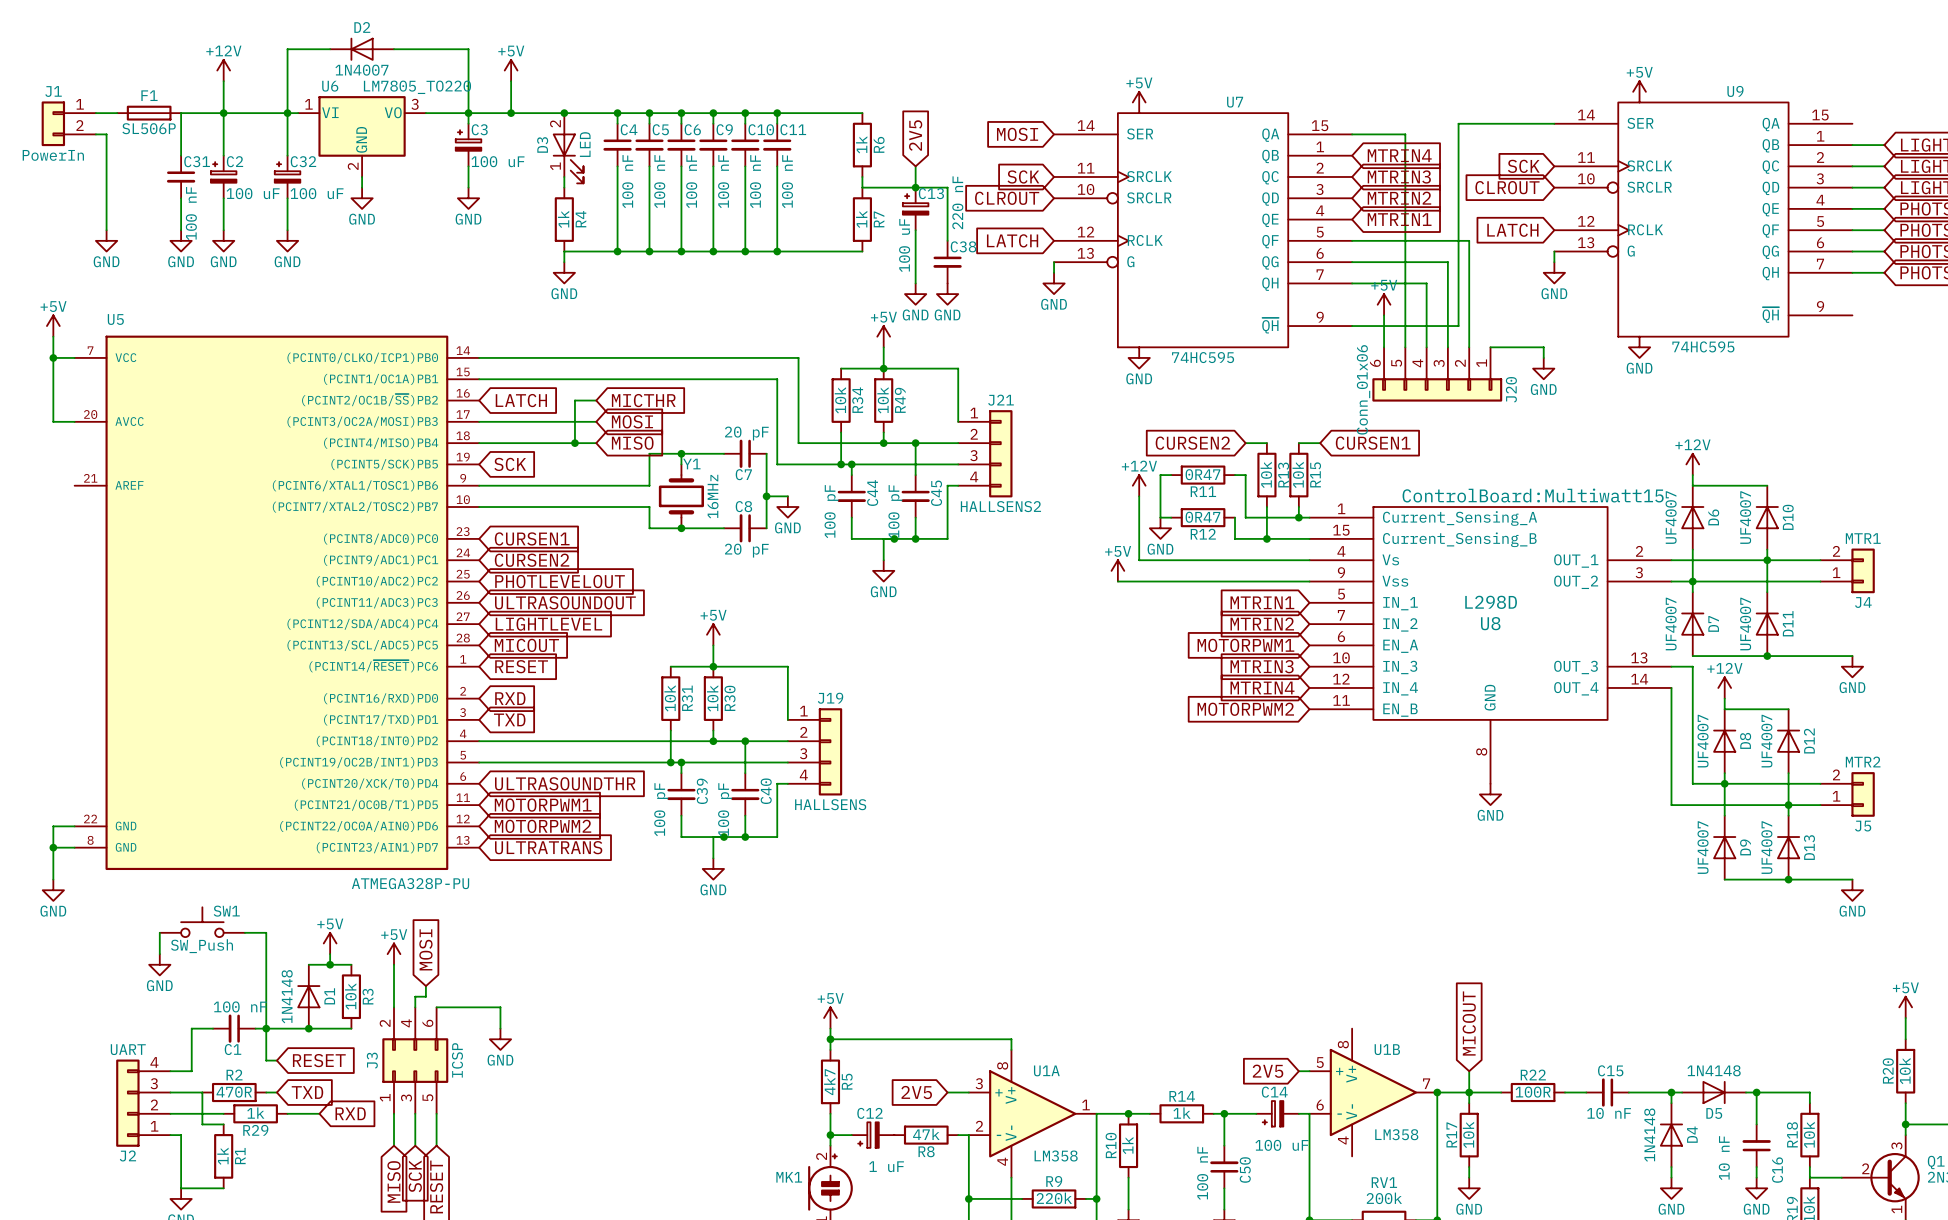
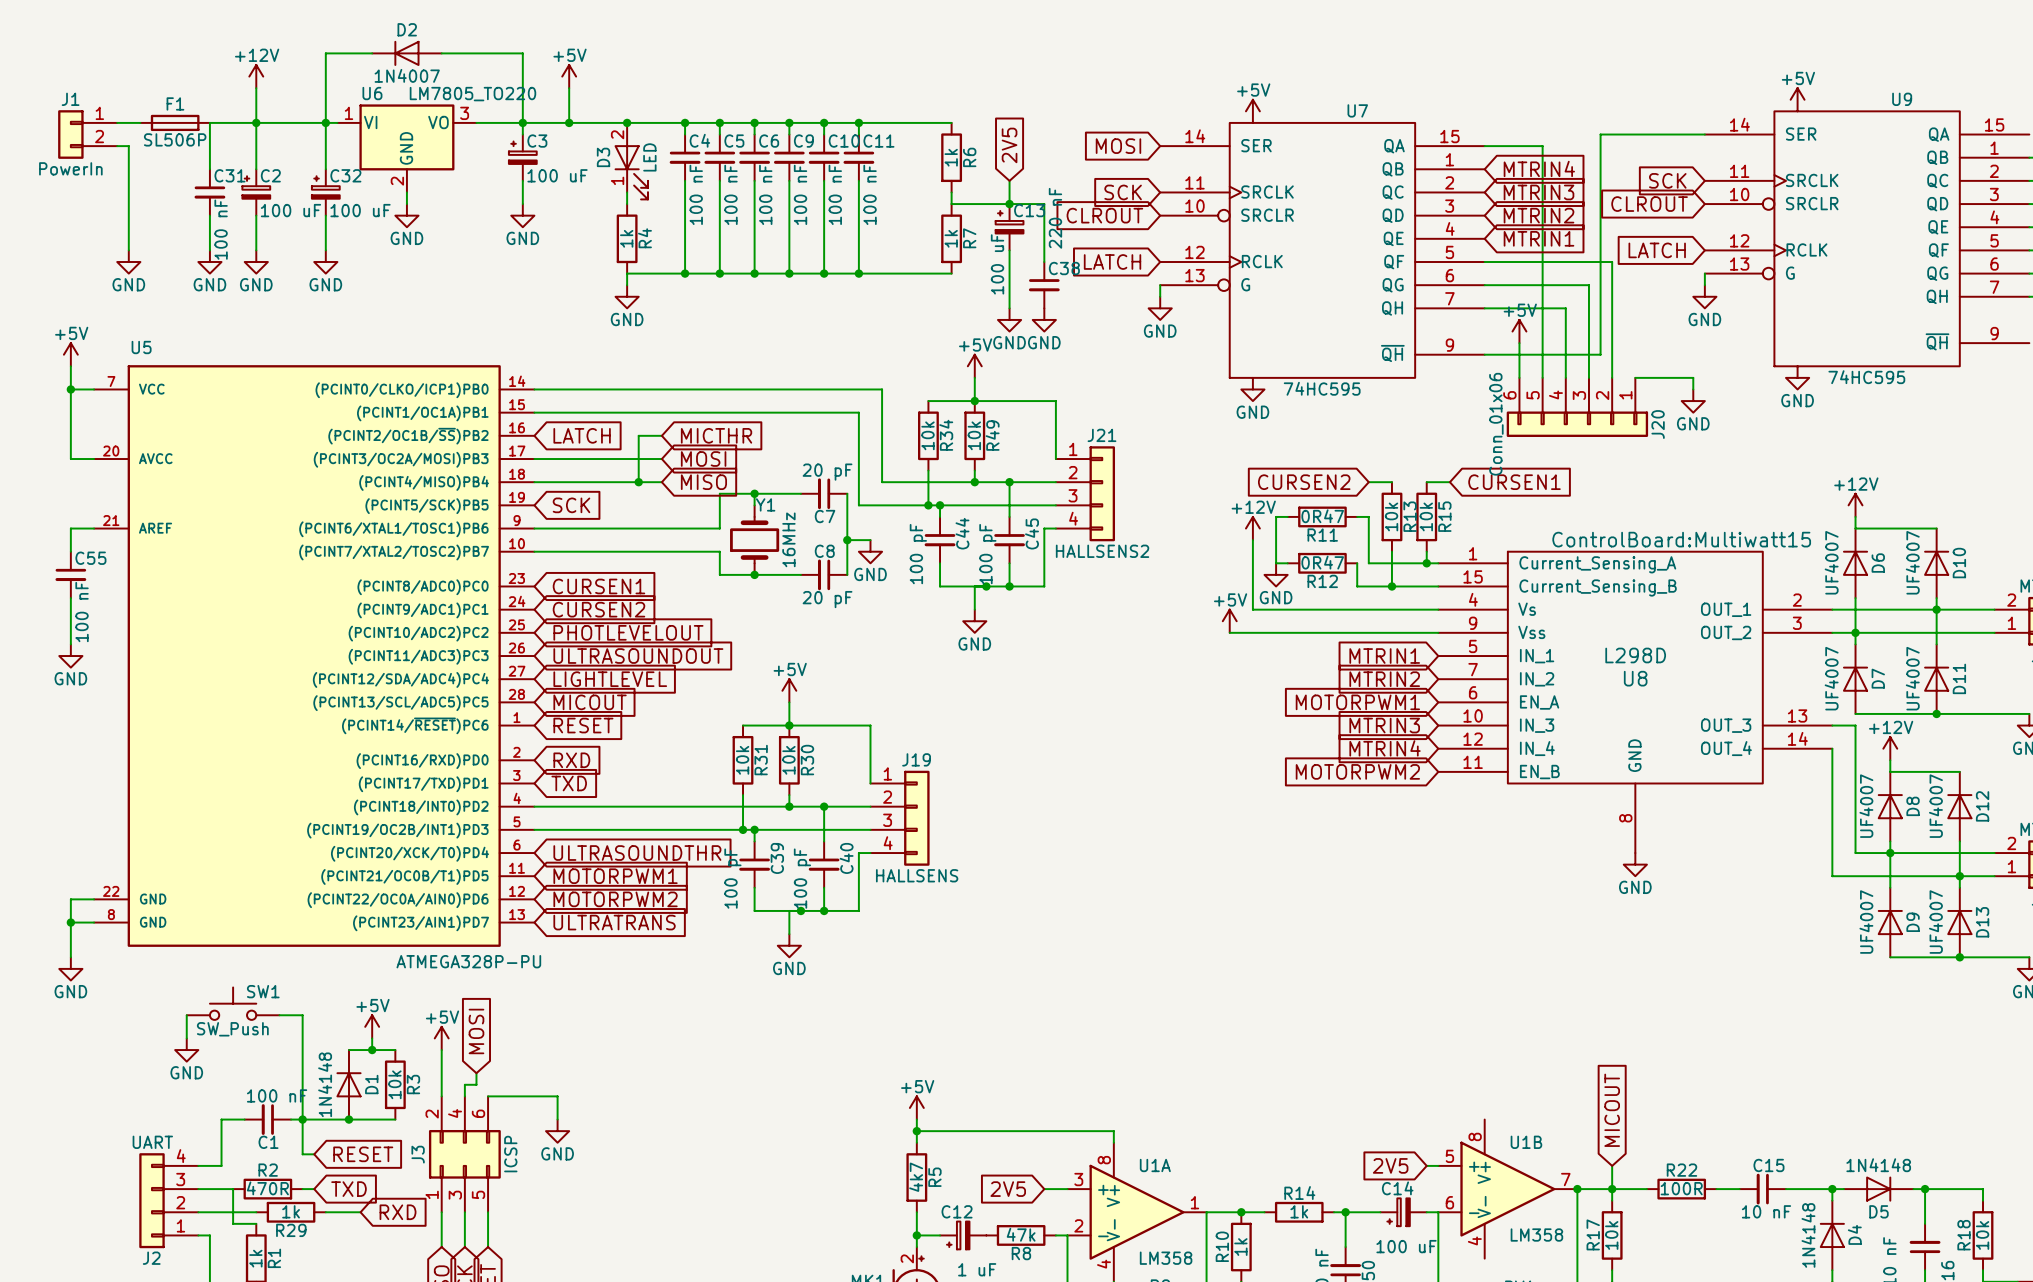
wire: none -> (94, 528) (70, 528) (70, 551)
C55: none -> 100 nF (70, 574)
wire: none -> (70, 598) (70, 644)
power symbol: none -> GND (70, 656)

